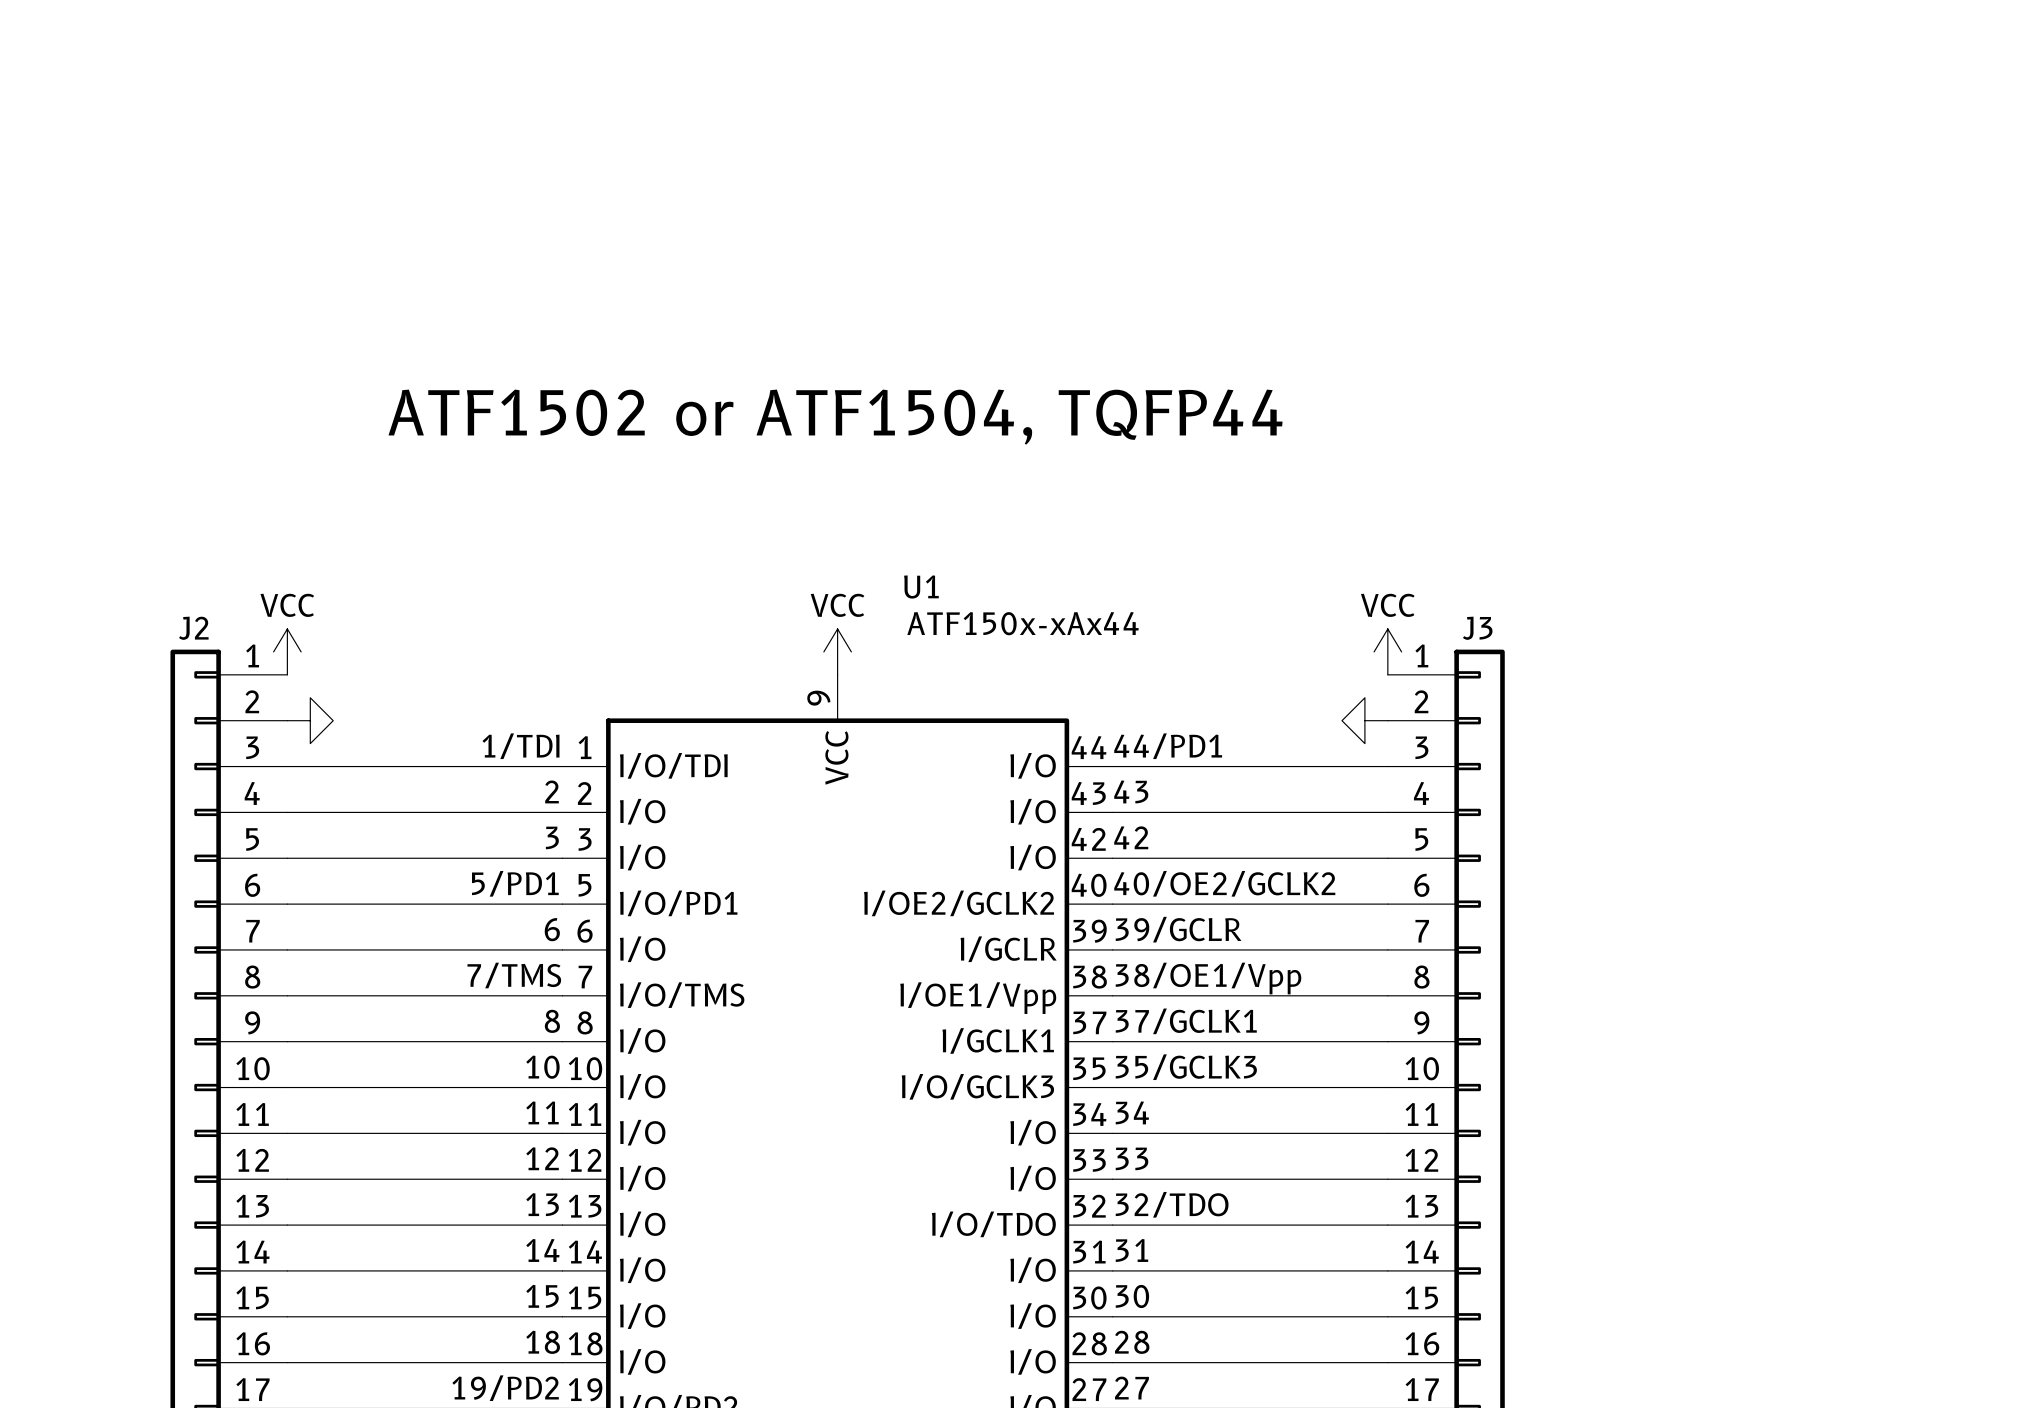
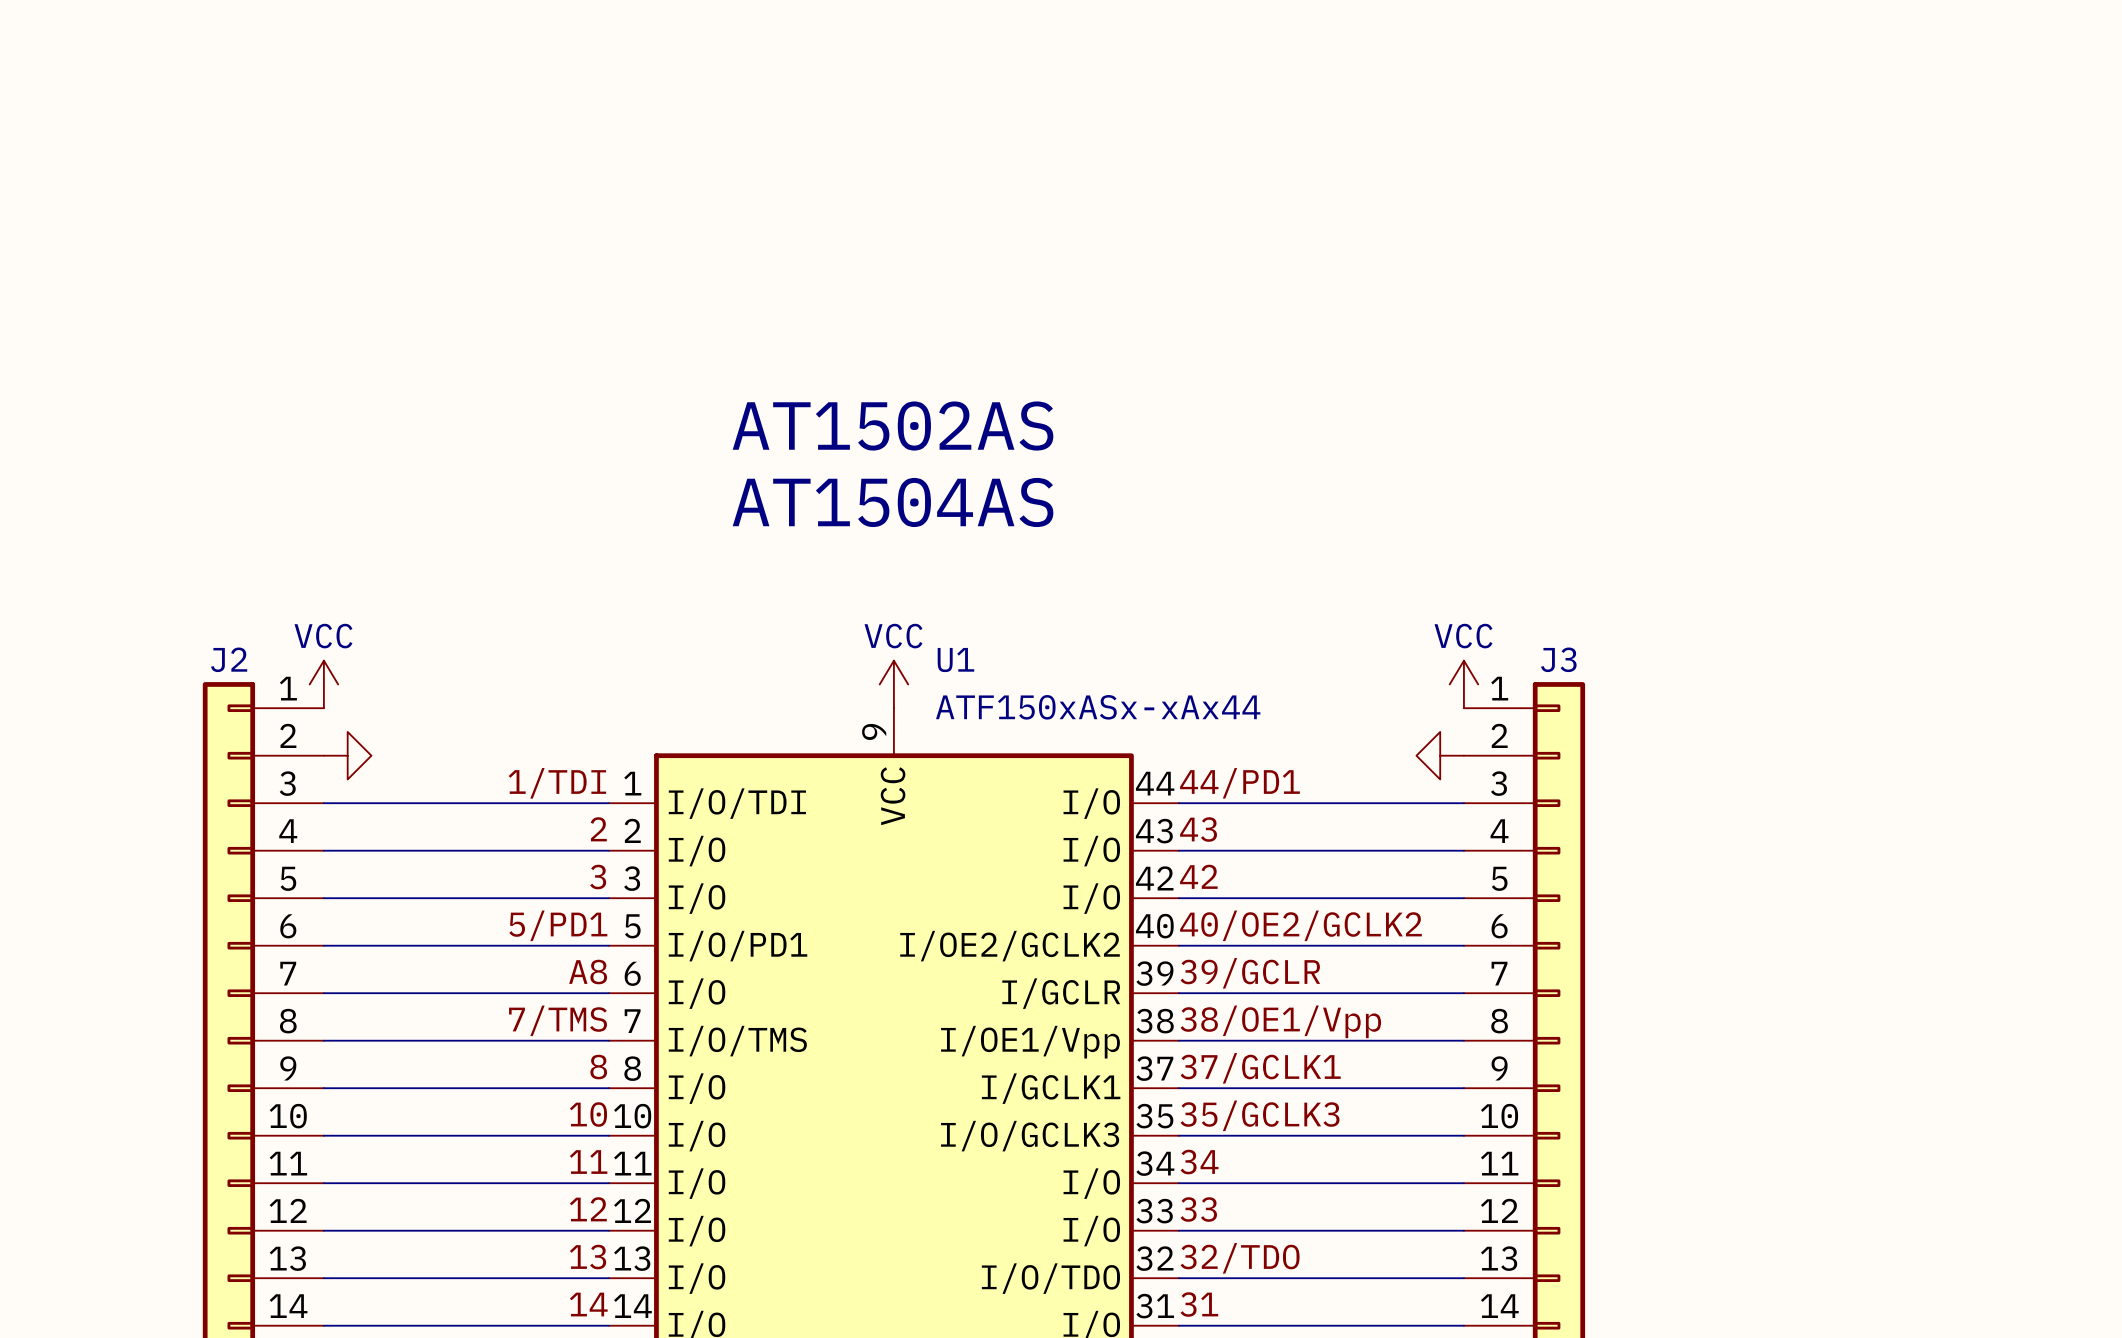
text: none -> AT1502AS (893, 426)
text: ATF1502 or ATF1504, TQFP44 (835, 417) -> none
text: none -> AT1504AS (893, 502)
U1 name position: U1 (921, 586) -> U1 (955, 660)
U1 value: ATF150x-xAx44 (1023, 623) -> ATF150xASx-xAx44 (1098, 707)
label: 6 (552, 929) -> A8 (588, 972)

